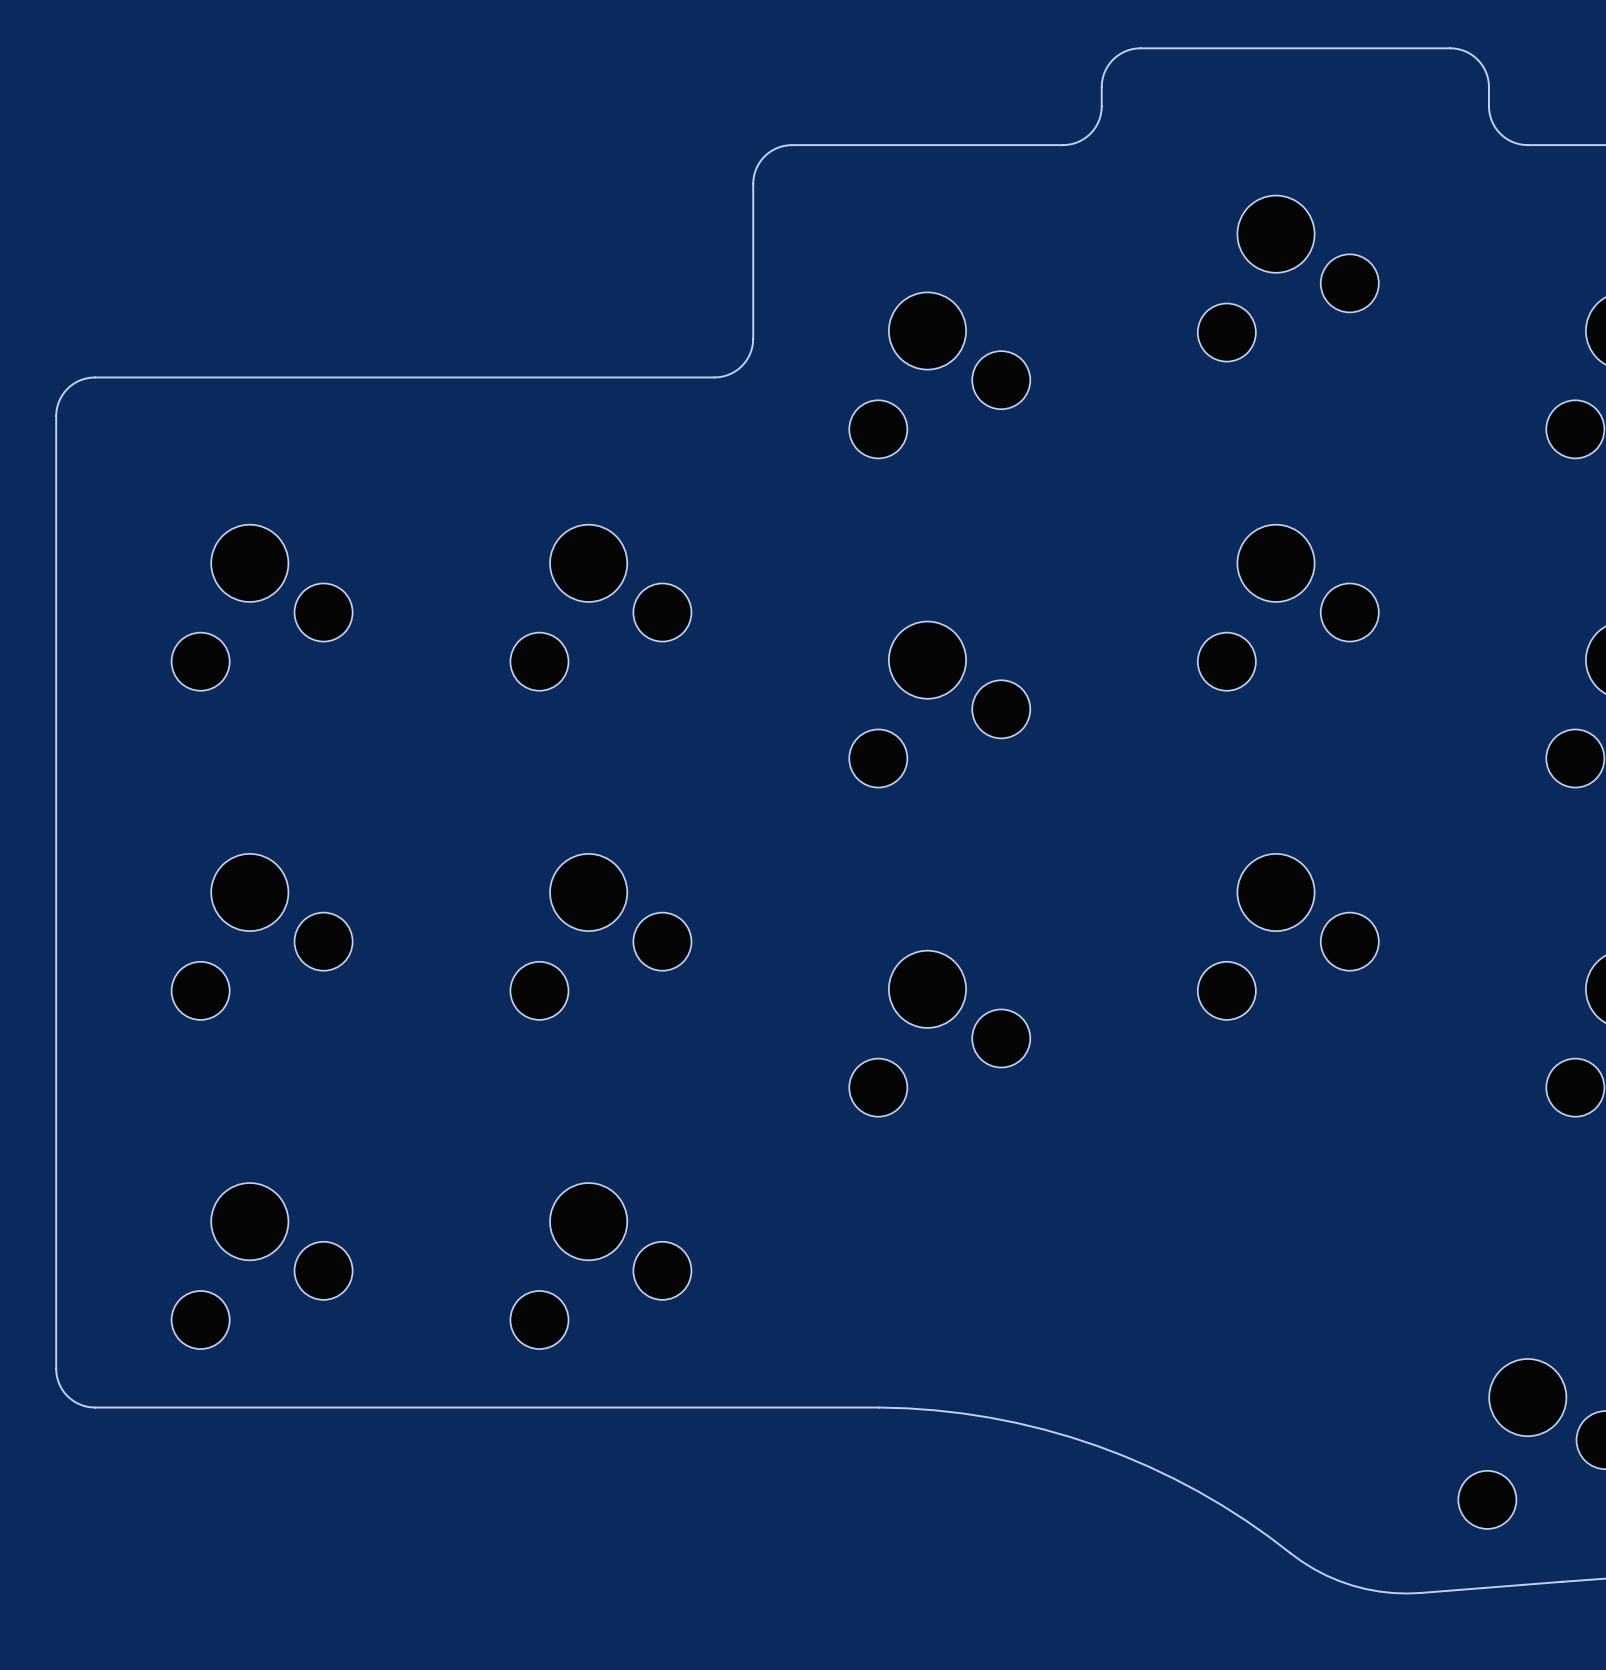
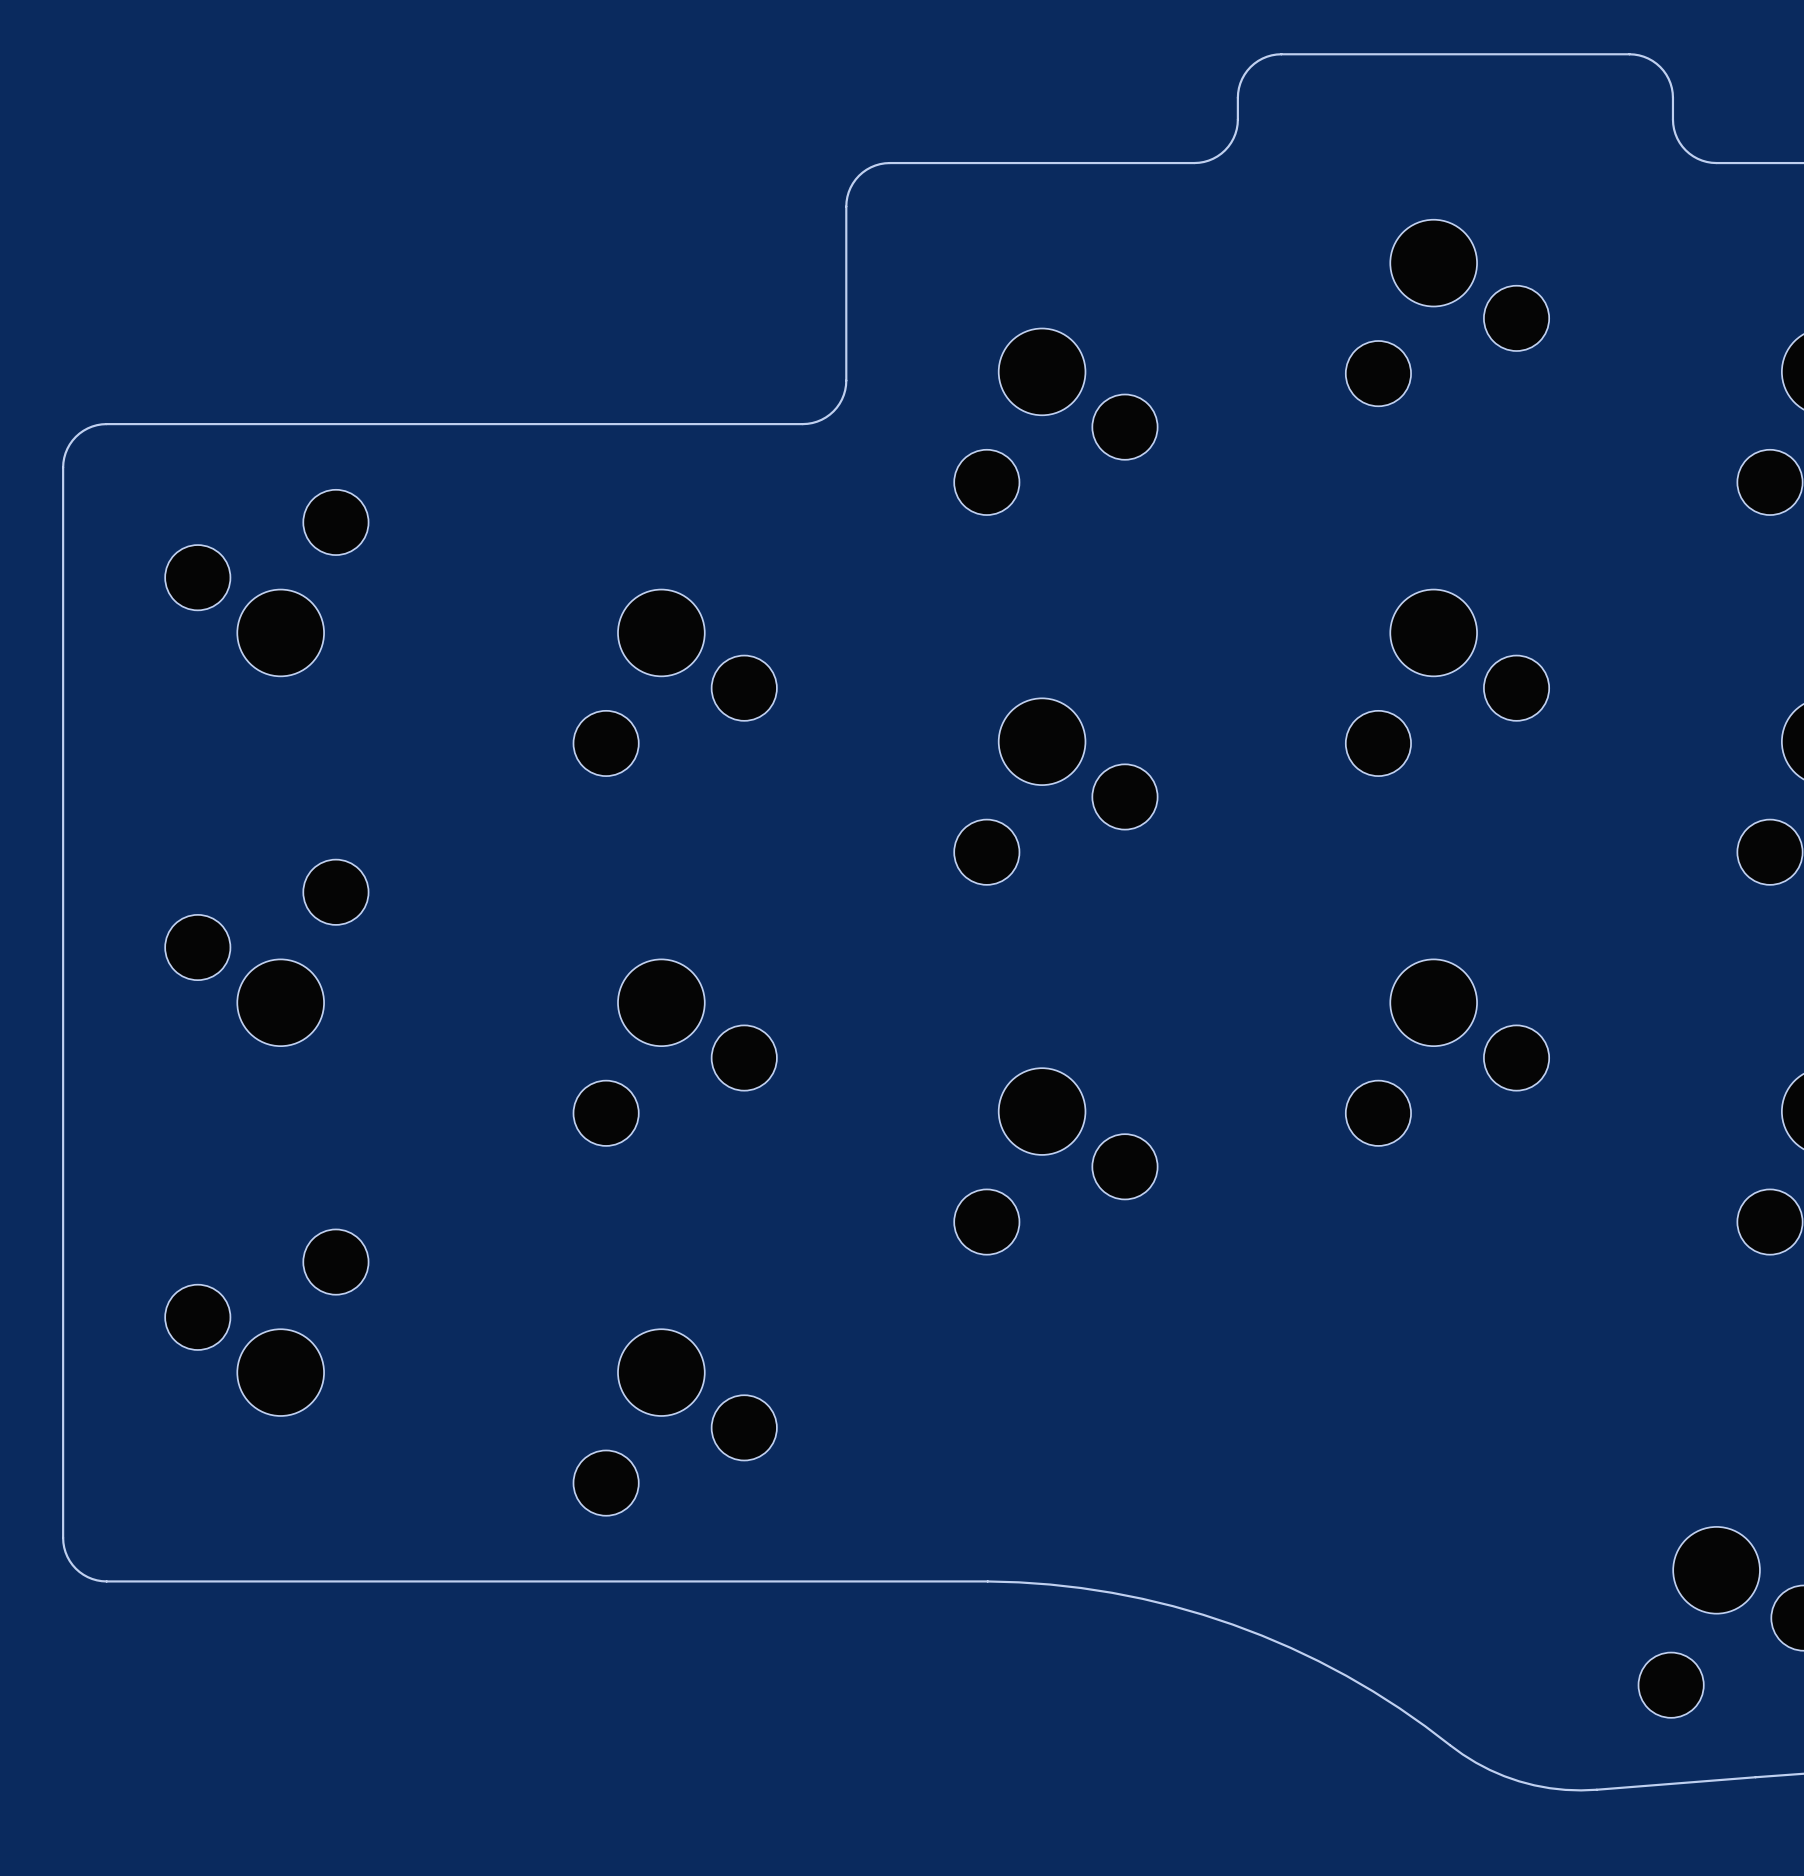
part rotation: 0° (262, 607) -> 180° (266, 583)
part rotation: 0° (262, 936) -> 180° (266, 952)
part rotation: 0° (262, 1266) -> 180° (266, 1322)

